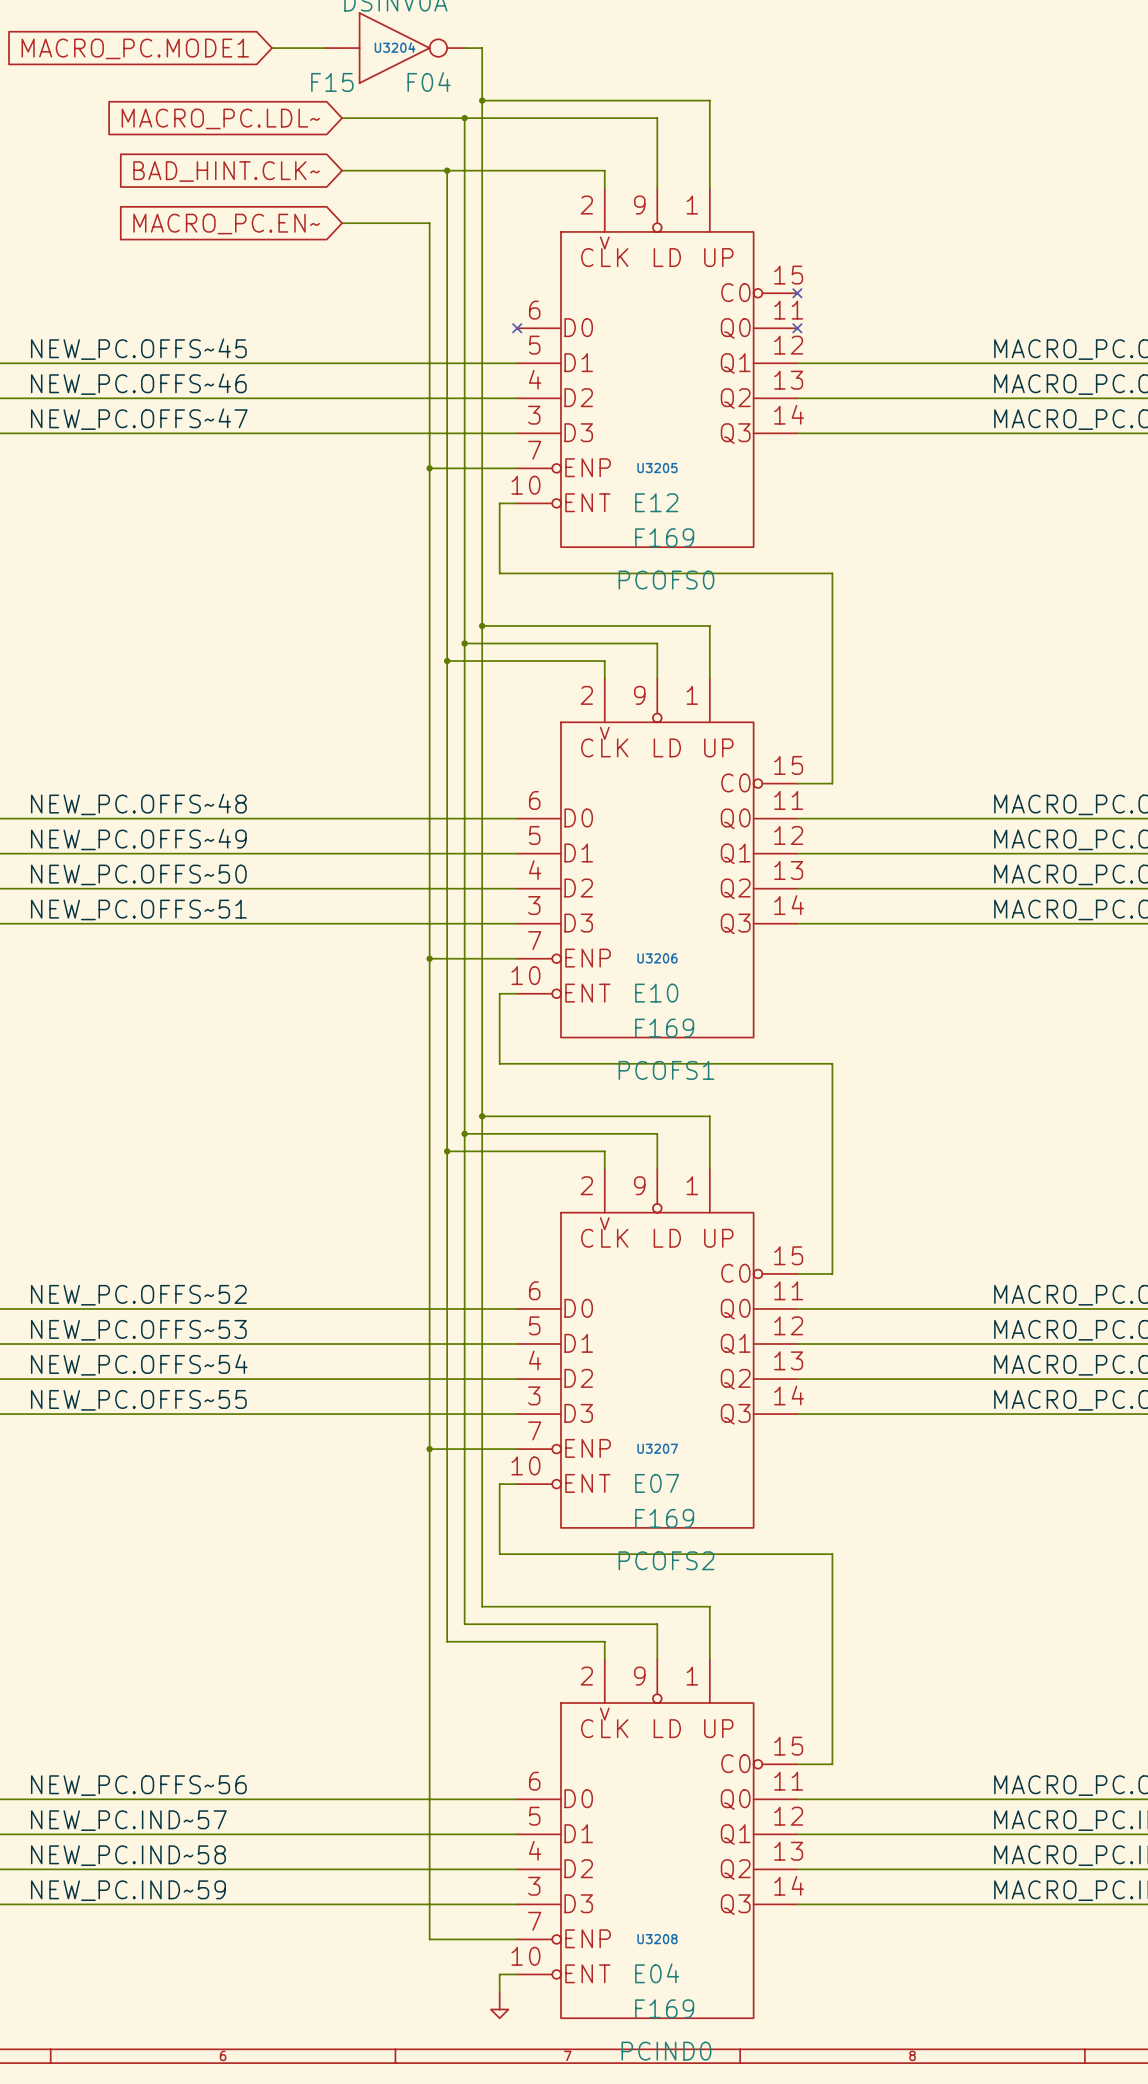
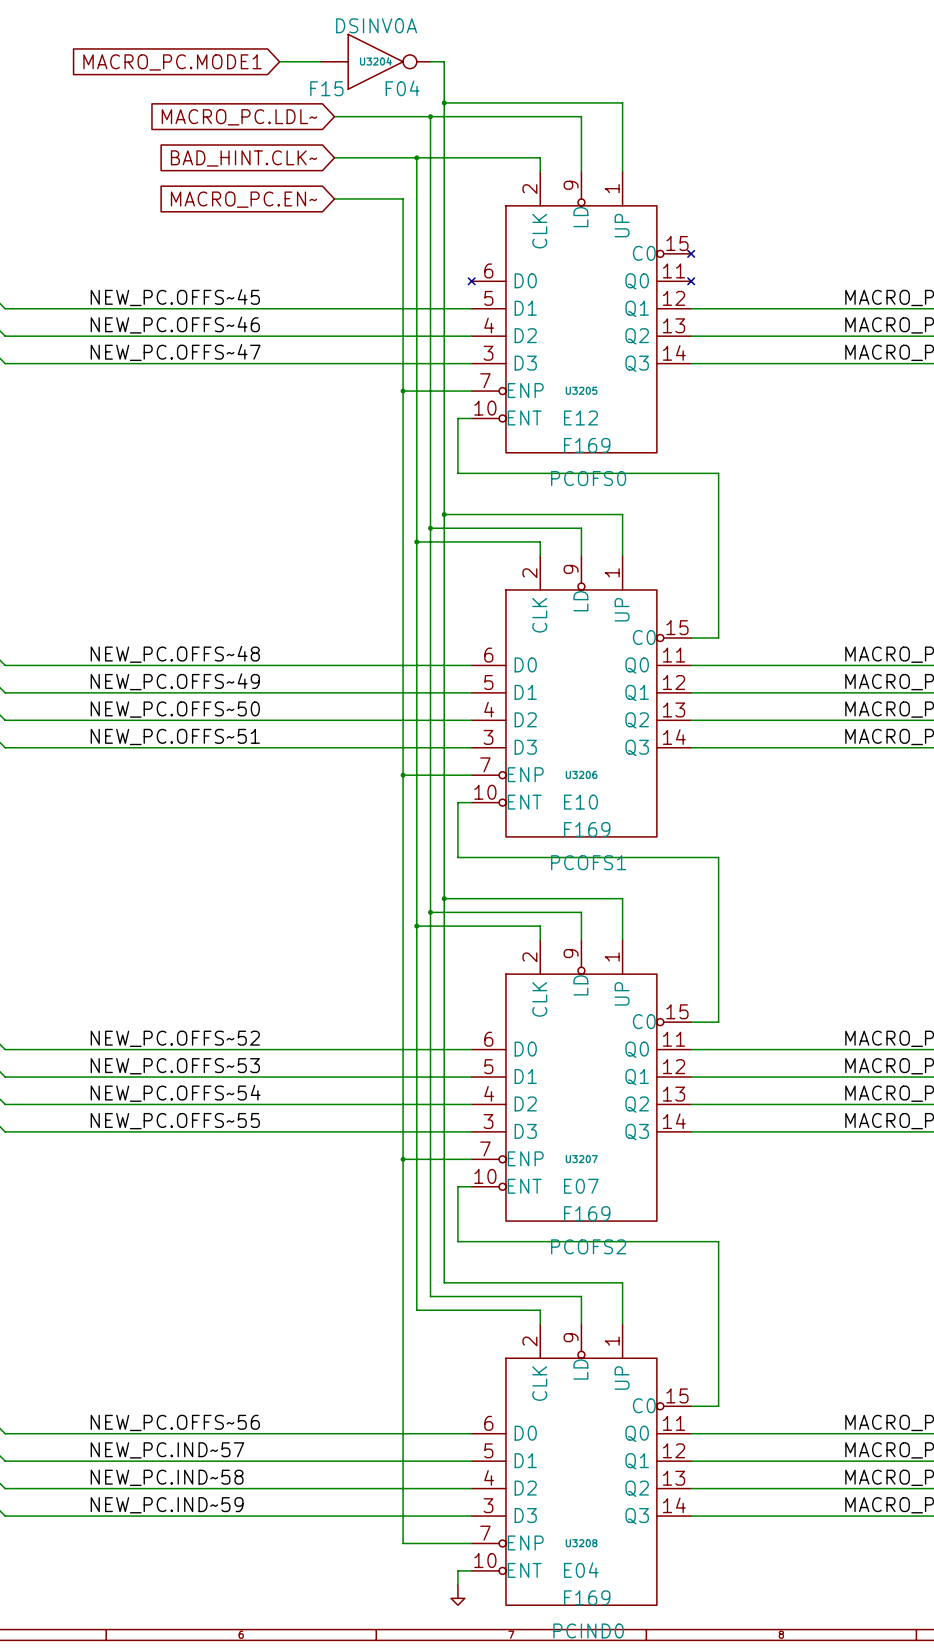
U3205 symbol: [517, 188, 798, 548] -> [471, 171, 692, 453]
U3206 symbol: [517, 678, 798, 1038] -> [471, 555, 692, 837]
U3207 symbol: [517, 1168, 798, 1528] -> [471, 939, 692, 1222]
U3208 symbol: [517, 1659, 798, 2019] -> [471, 1323, 692, 1606]

